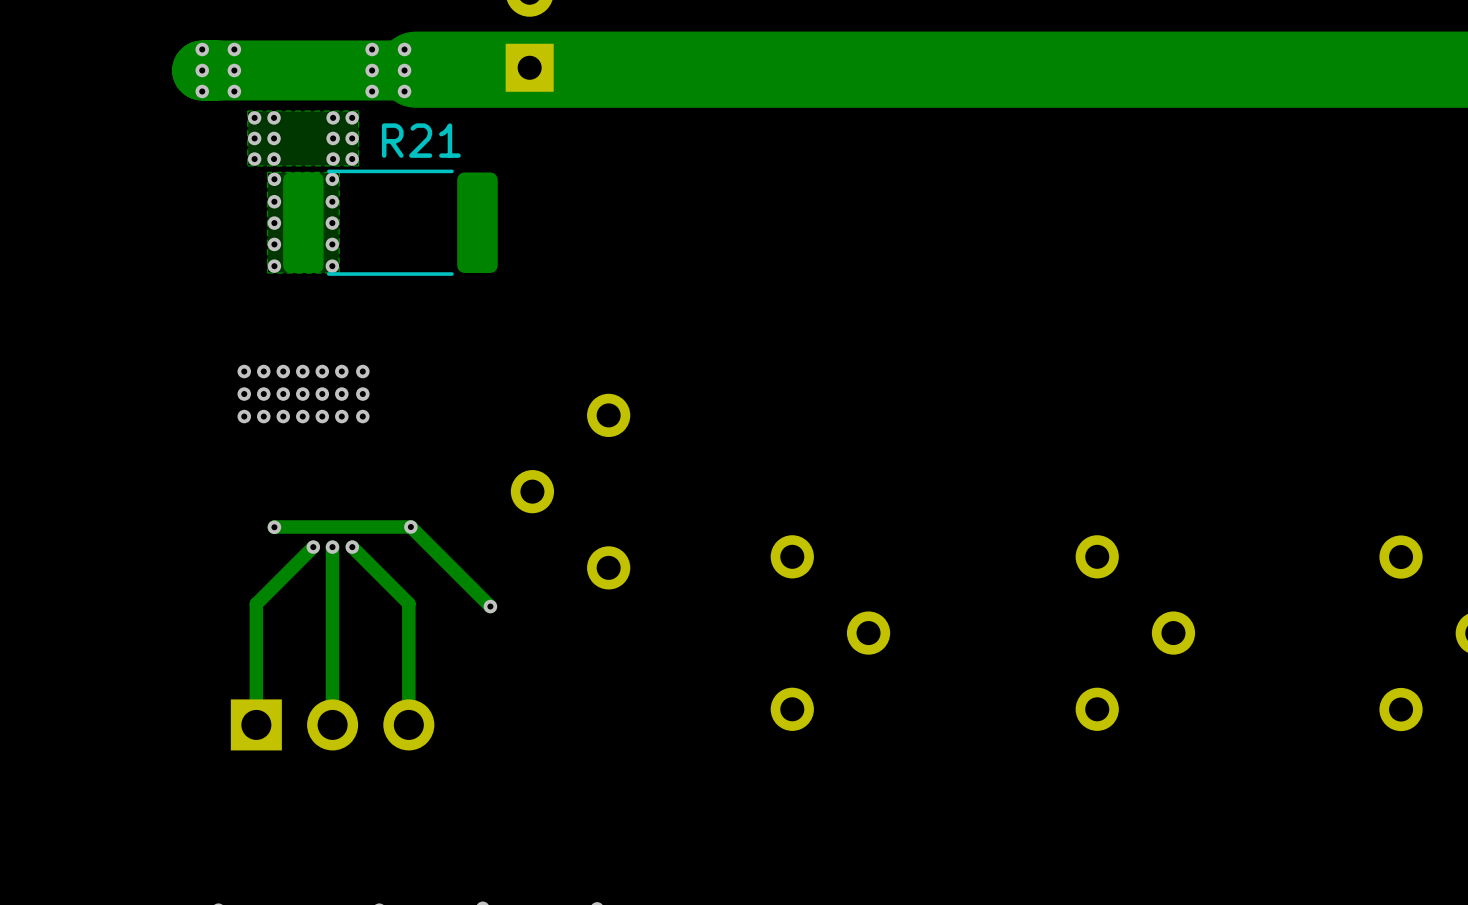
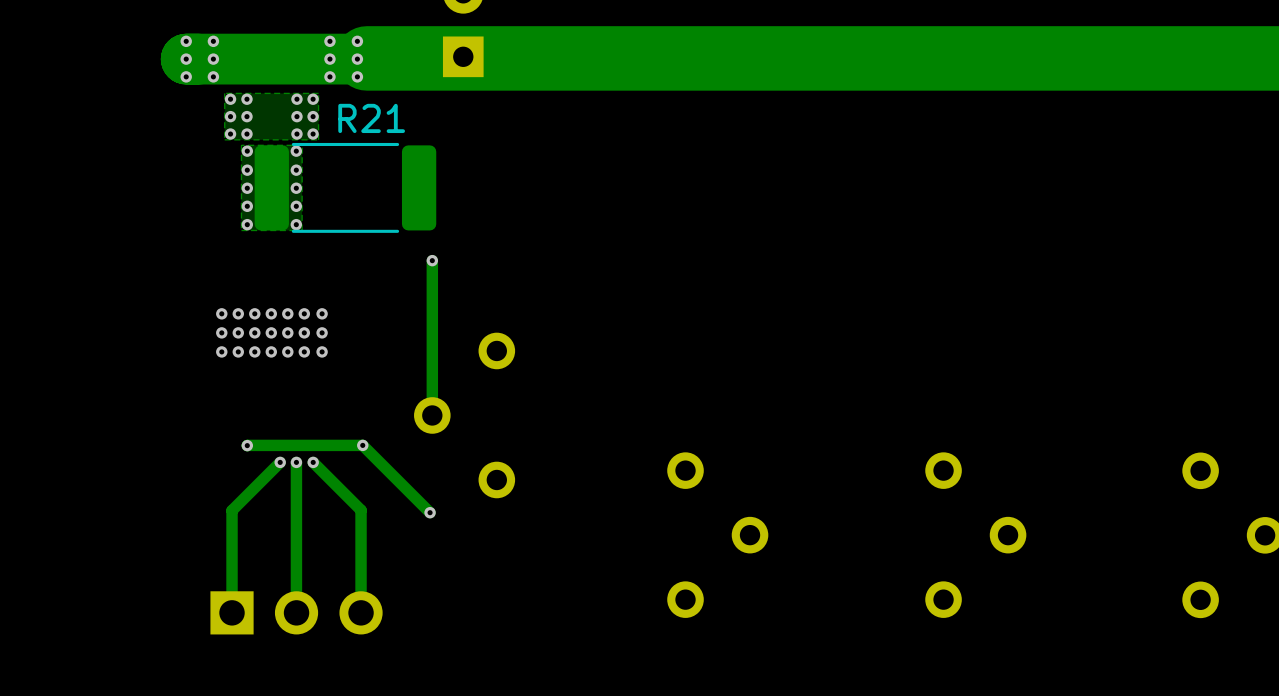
track: none -> (432, 260) (432, 415)
via: none -> (432, 260)
part position: (570, 491) -> (464, 415)

